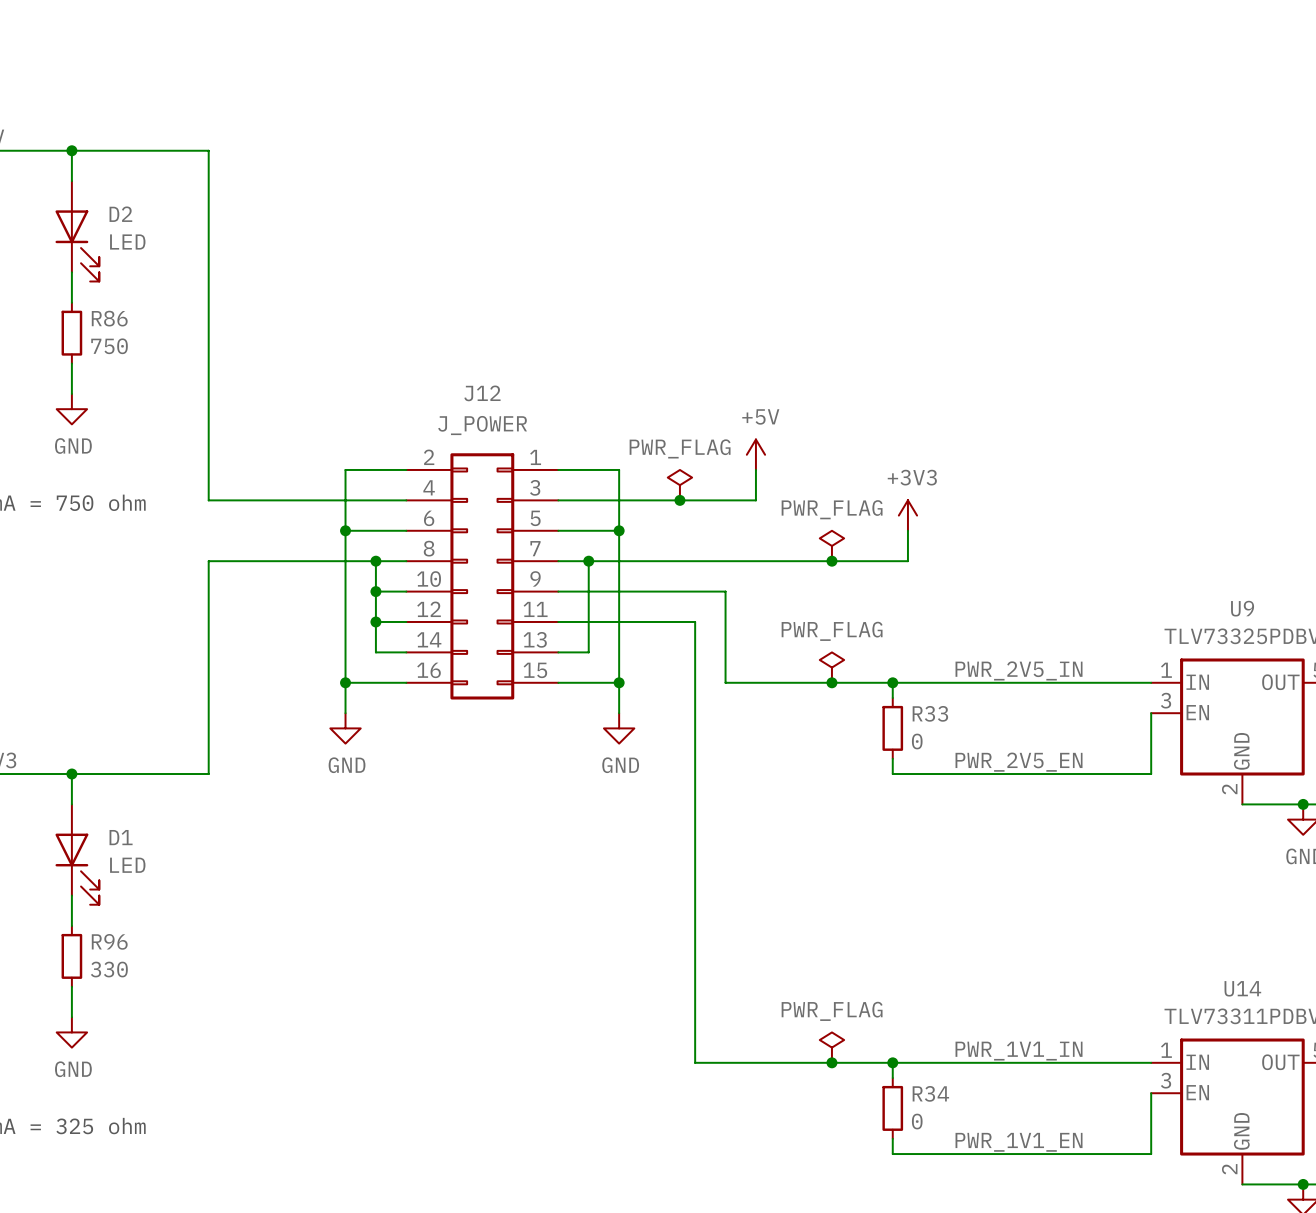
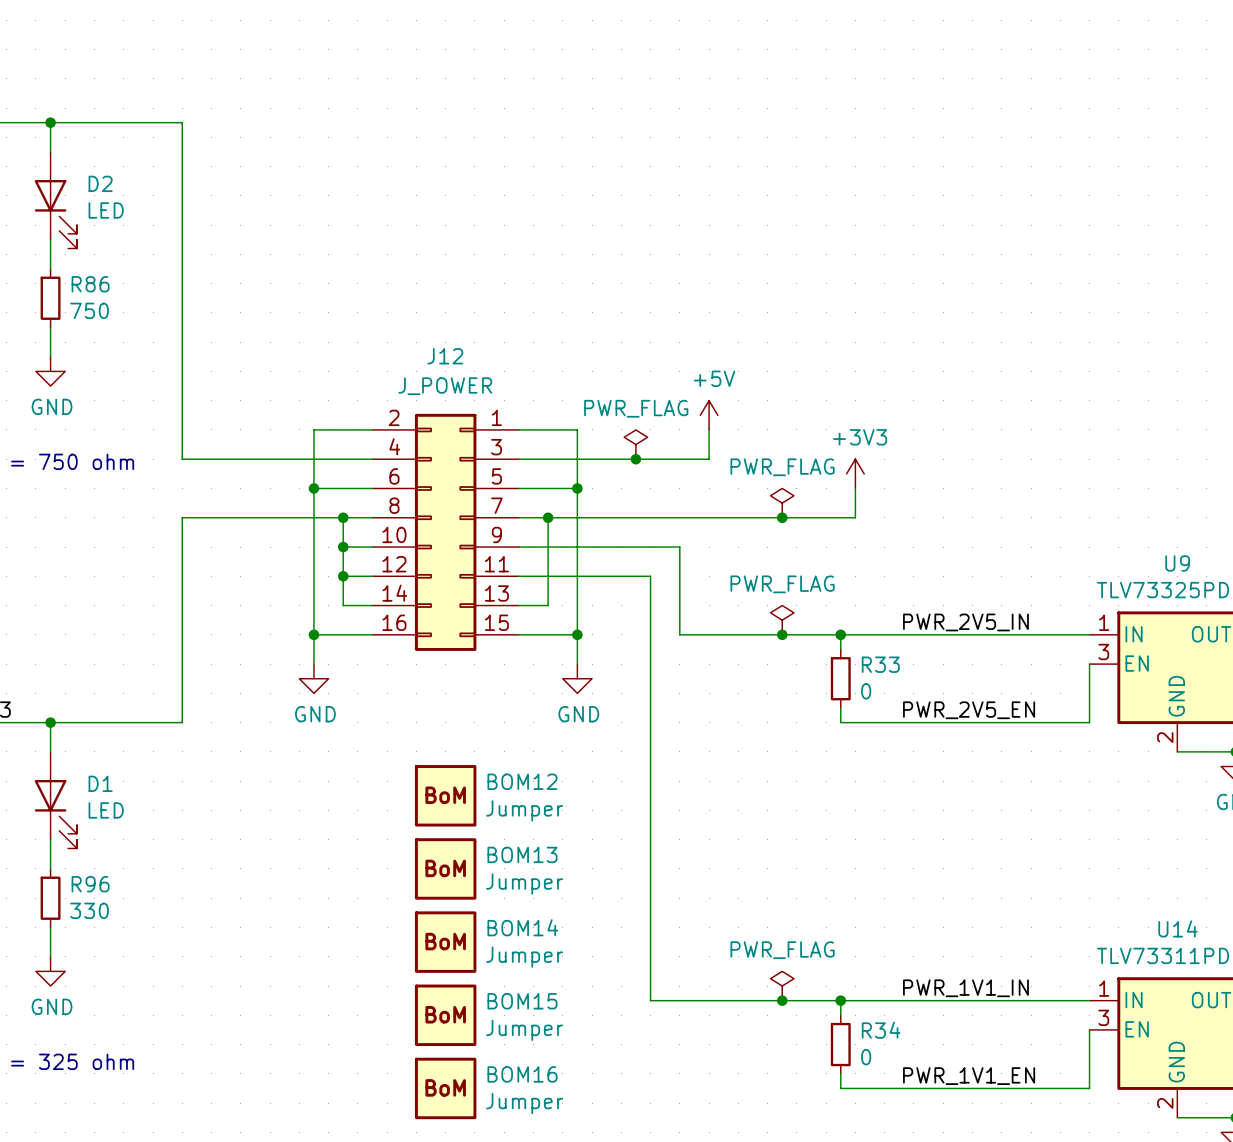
BOM12: none -> Jumper (445, 795)
BOM13: none -> Jumper (445, 868)
BOM14: none -> Jumper (445, 942)
BOM15: none -> Jumper (445, 1015)
BOM16: none -> Jumper (445, 1088)

